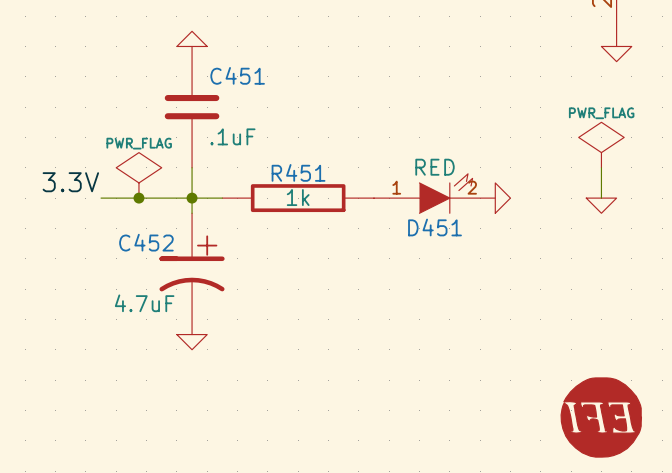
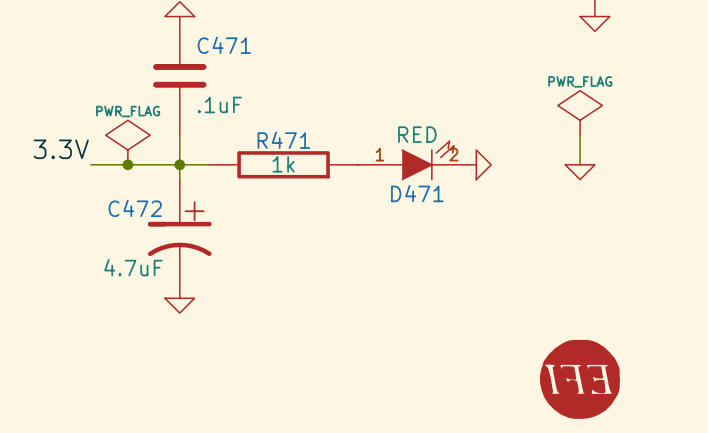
C451 name: C451 (237, 75) -> C471 (224, 45)
R451 name: R451 (298, 172) -> R471 (283, 140)
D451 name: D451 (435, 227) -> D471 (417, 193)
C452 name: C452 (146, 242) -> C472 (135, 208)

